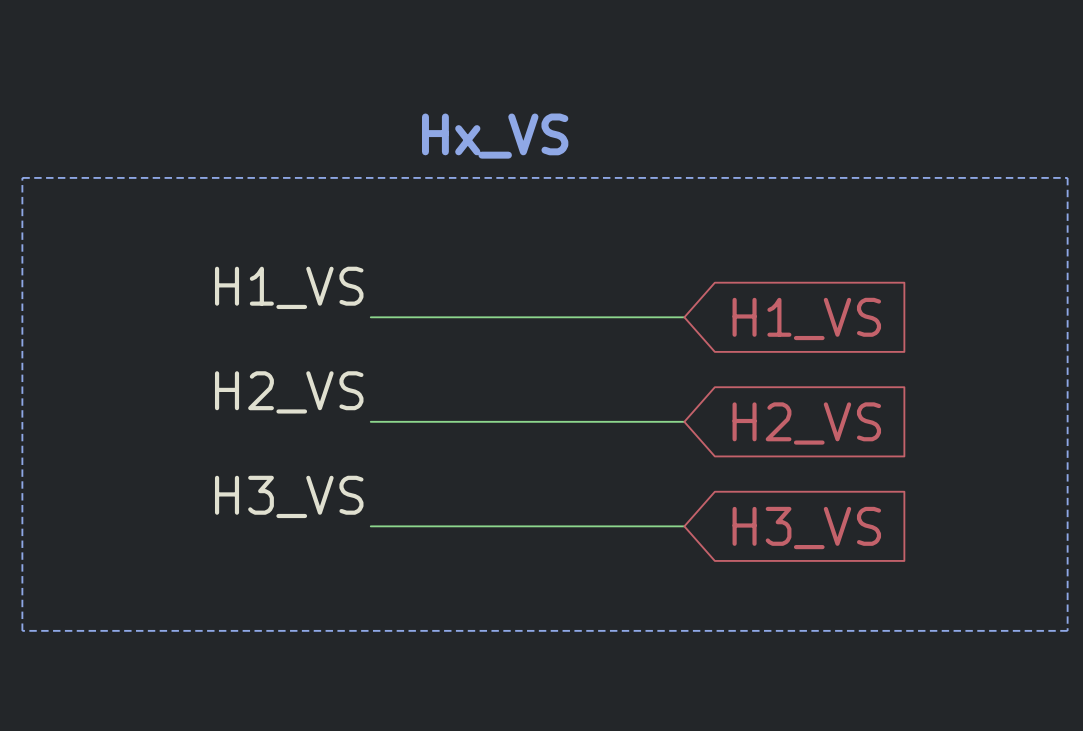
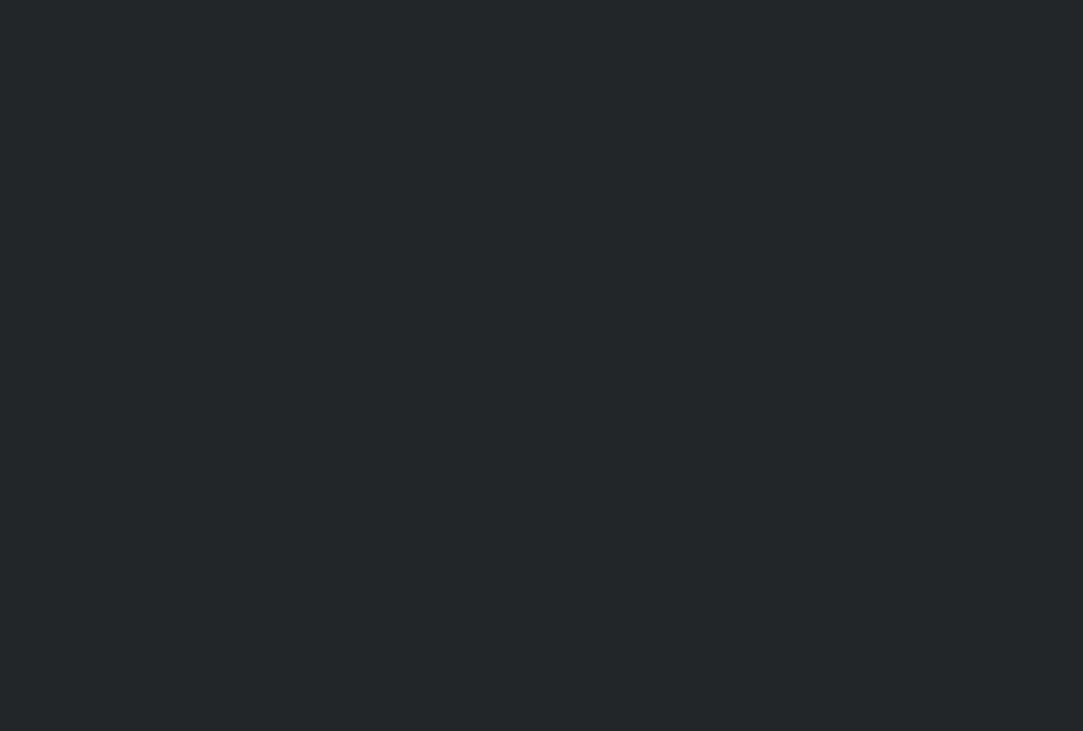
text: Hx_VS (495, 136) -> none
line: (22, 177) (1067, 177) (1067, 630) (22, 630) (22, 177) -> none
label: H1_VS (289, 287) -> none
wire: (370, 317) (684, 317) -> none
global label: H1_VS (806, 318) -> none
label: H2_VS (289, 392) -> none
wire: (370, 421) (684, 421) -> none
global label: H2_VS (806, 423) -> none
label: H3_VS (289, 496) -> none
wire: (370, 526) (684, 526) -> none
global label: H3_VS (806, 528) -> none

